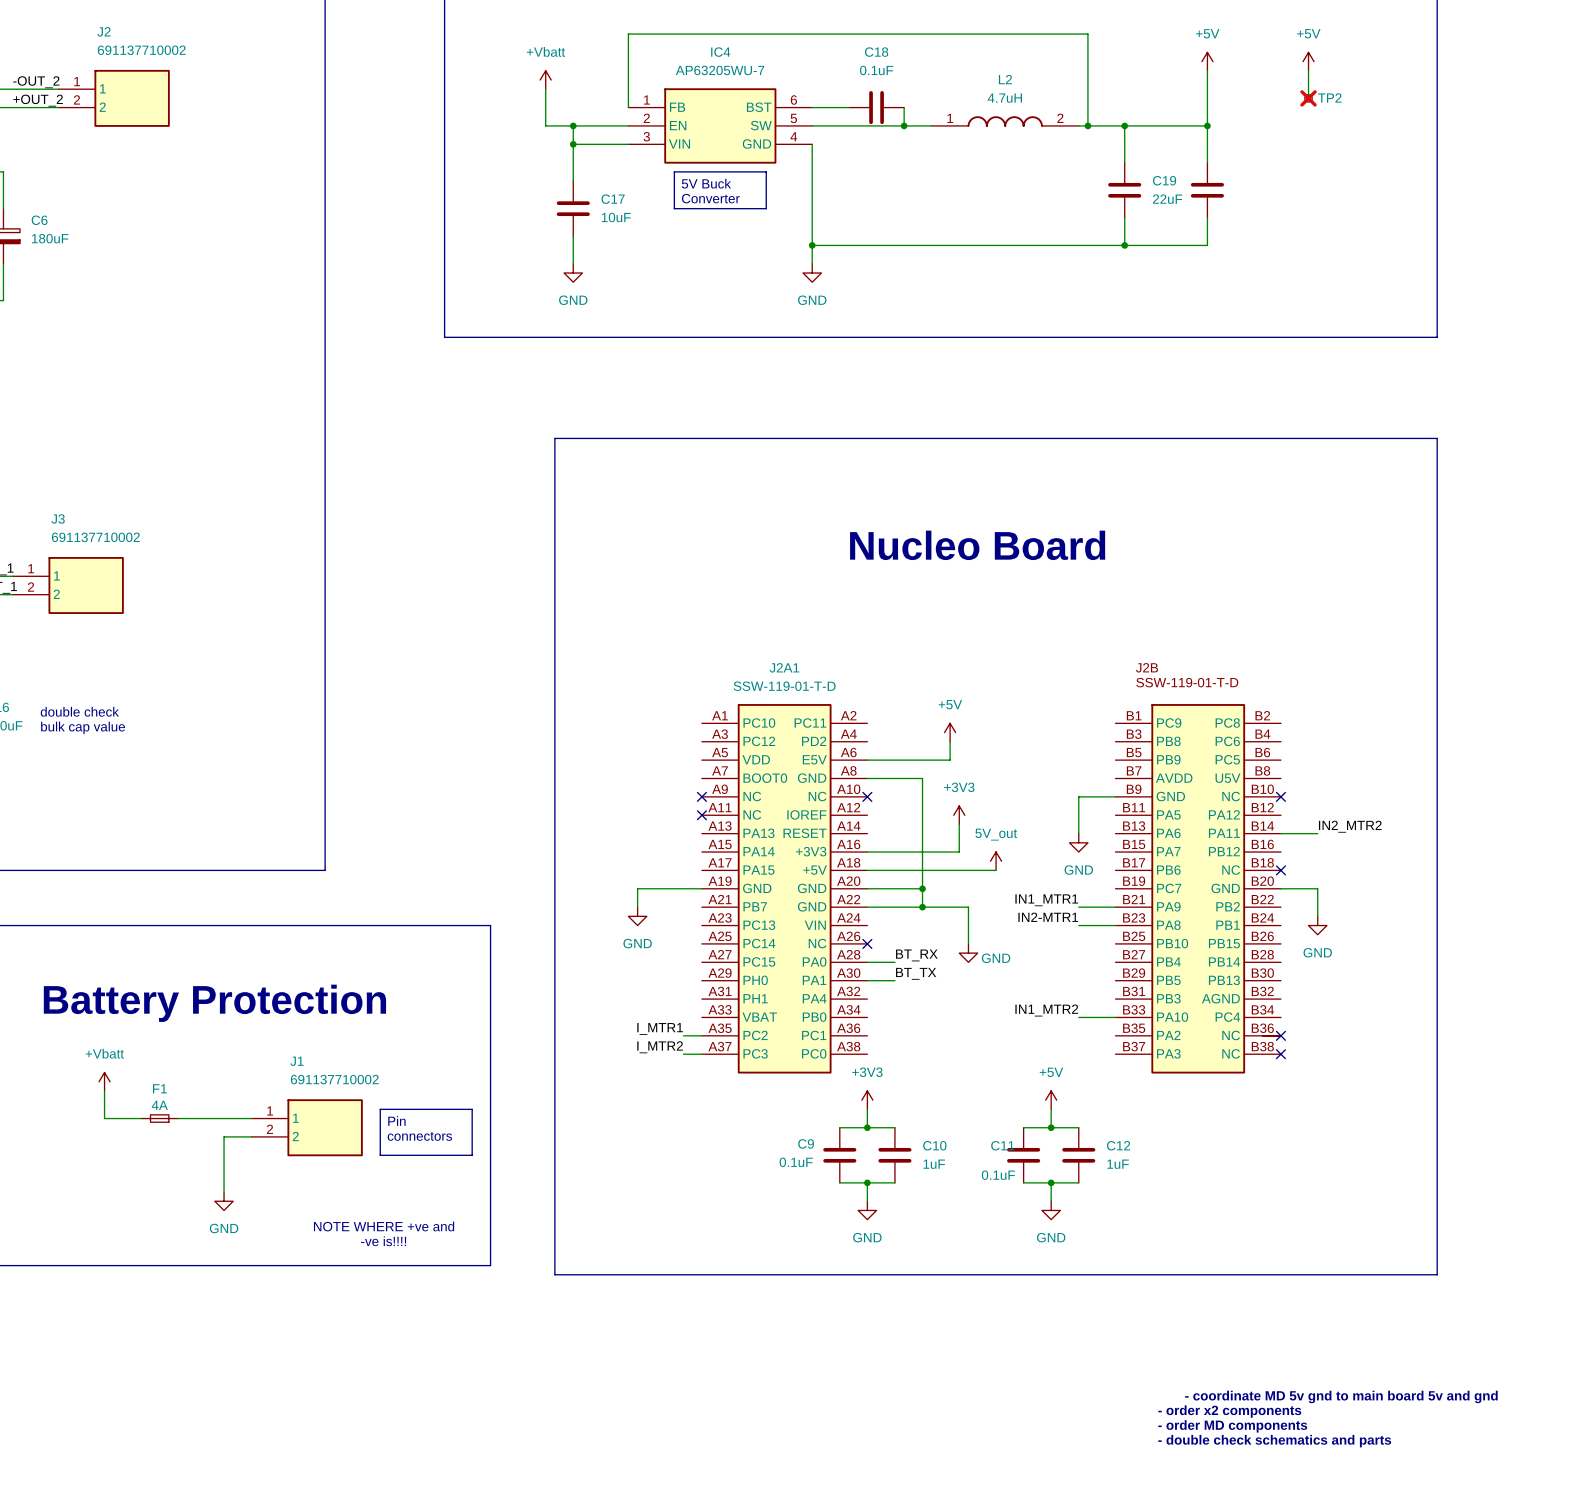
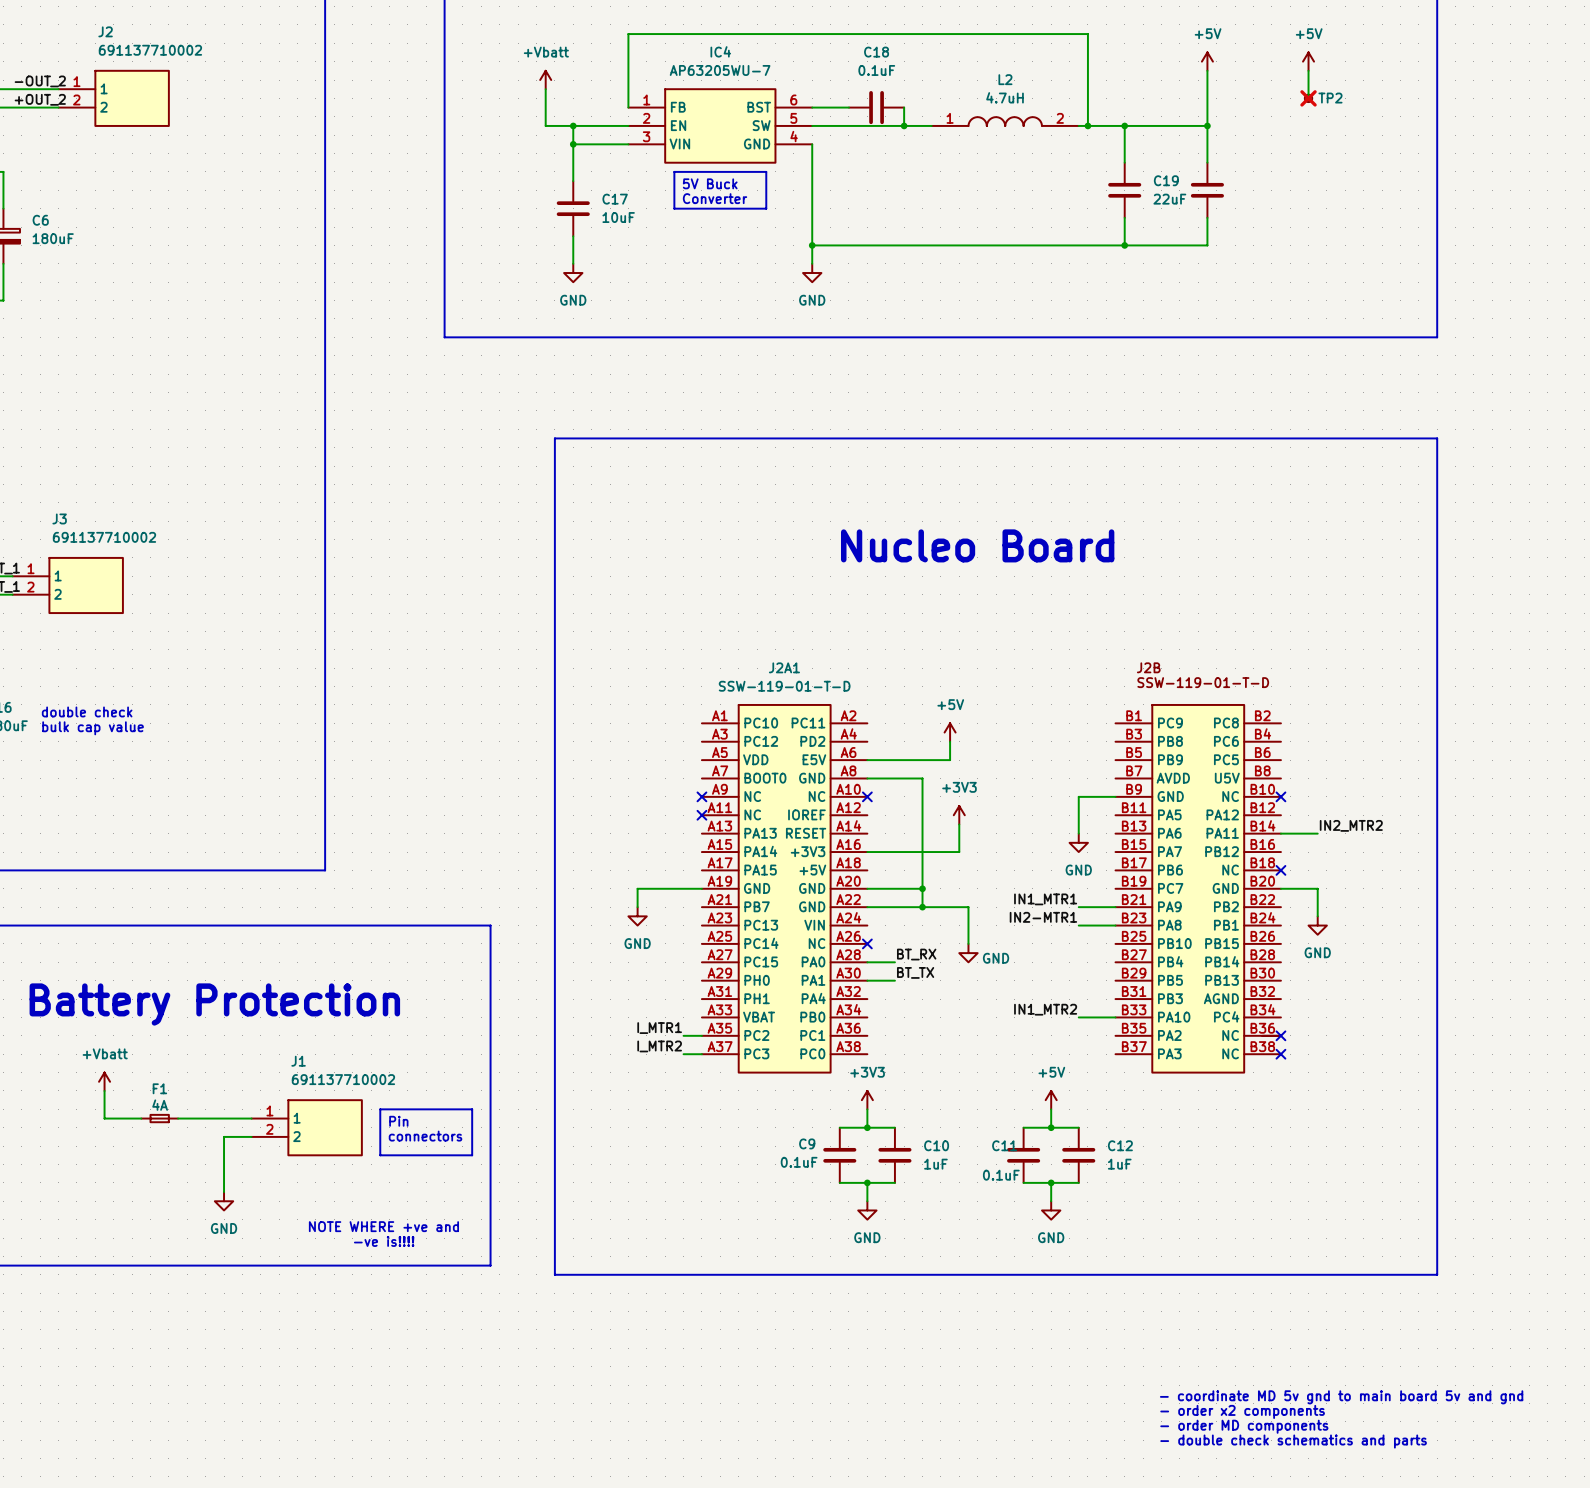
power symbol: 5V_out (996, 861) -> none
wire: (867, 870) (996, 870) -> none

